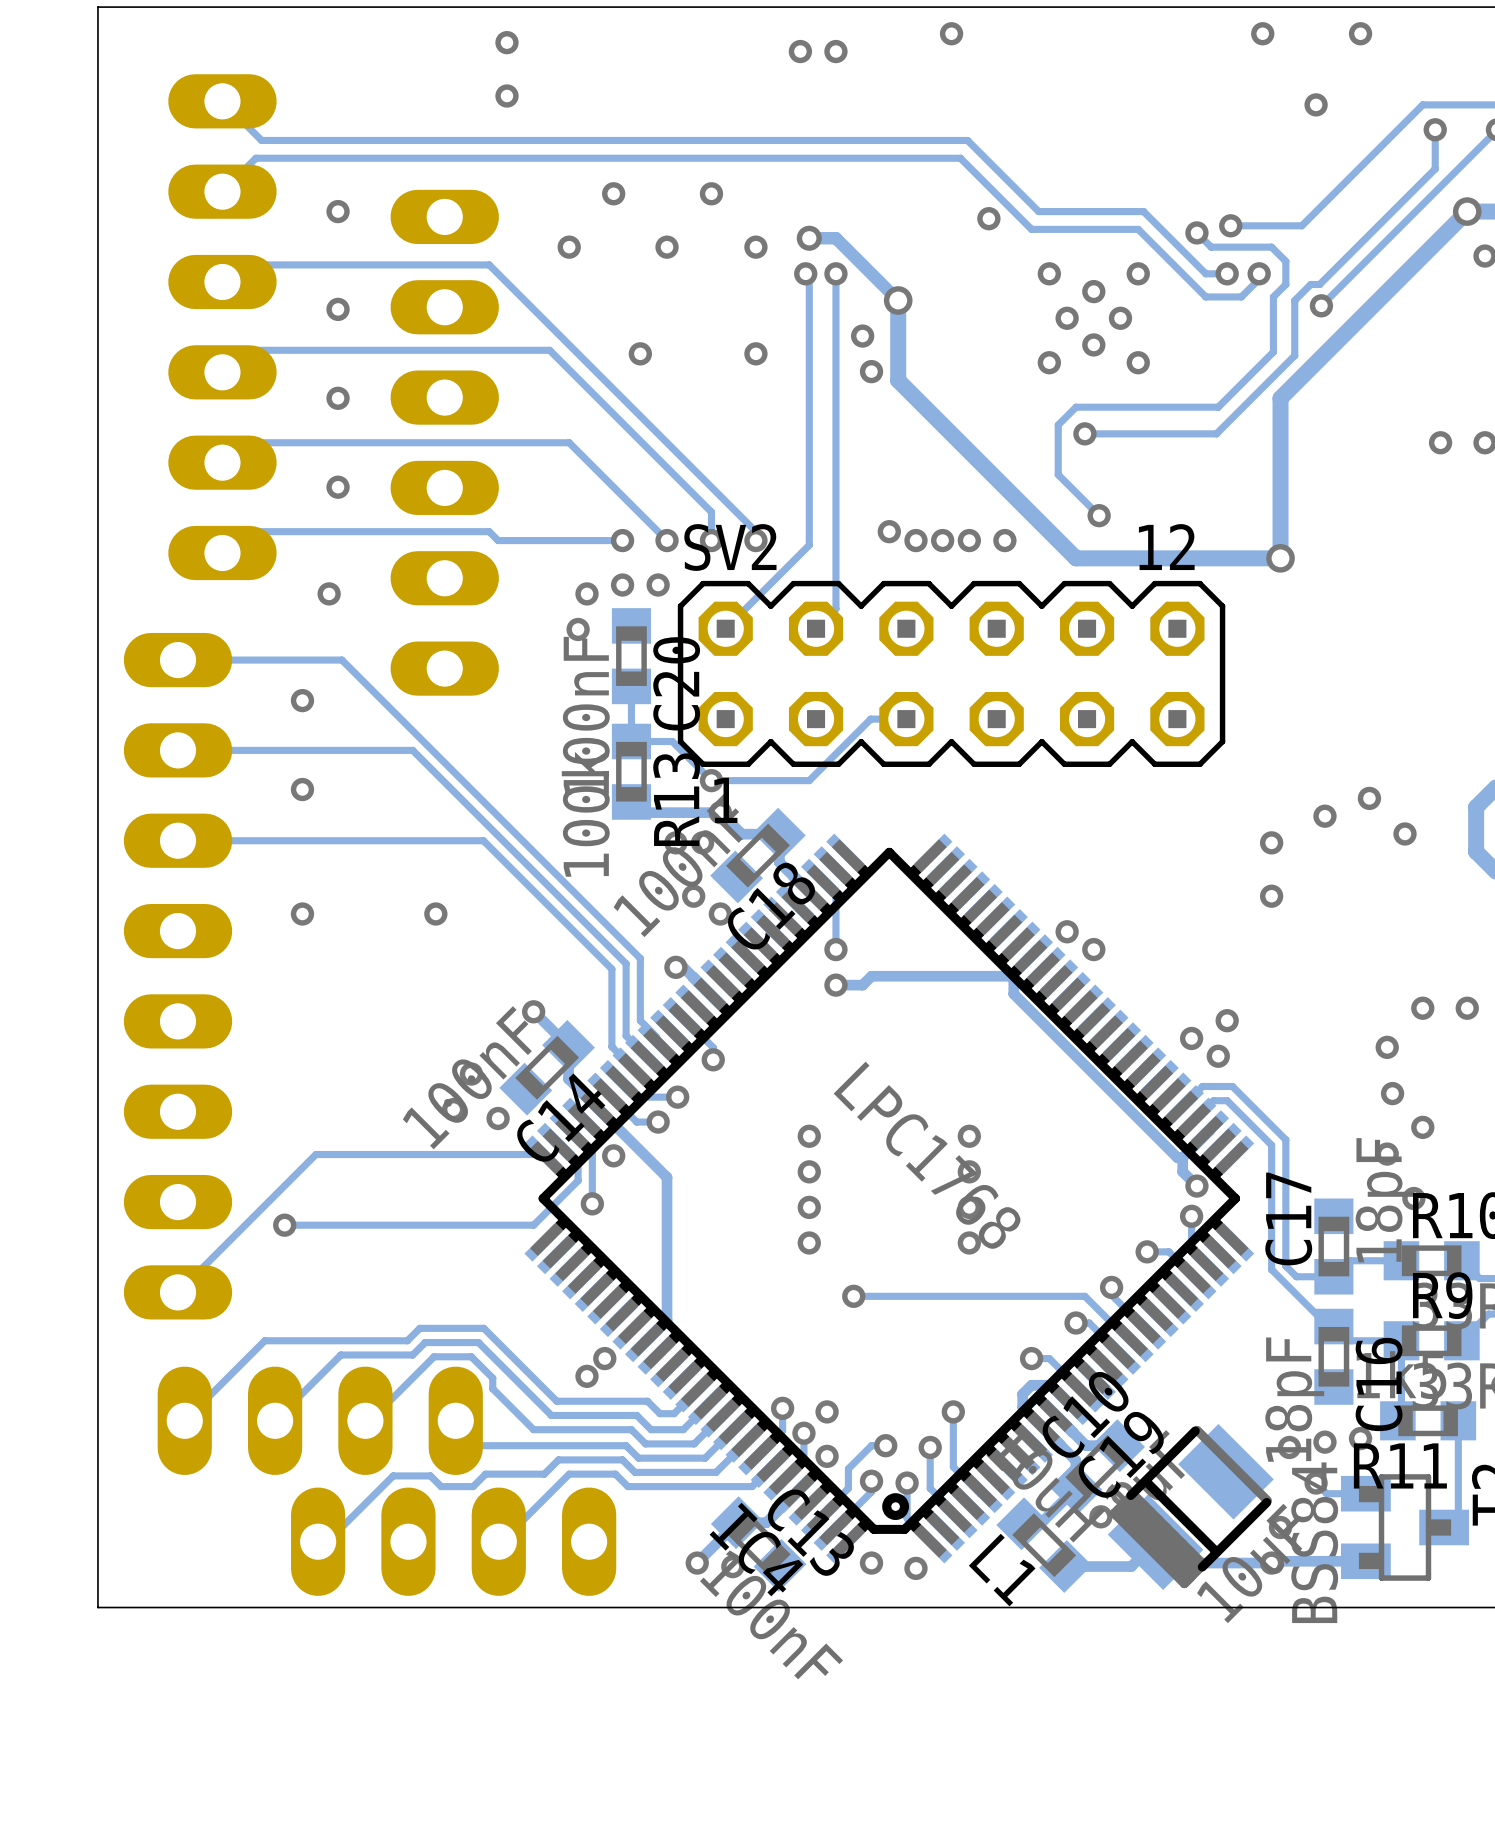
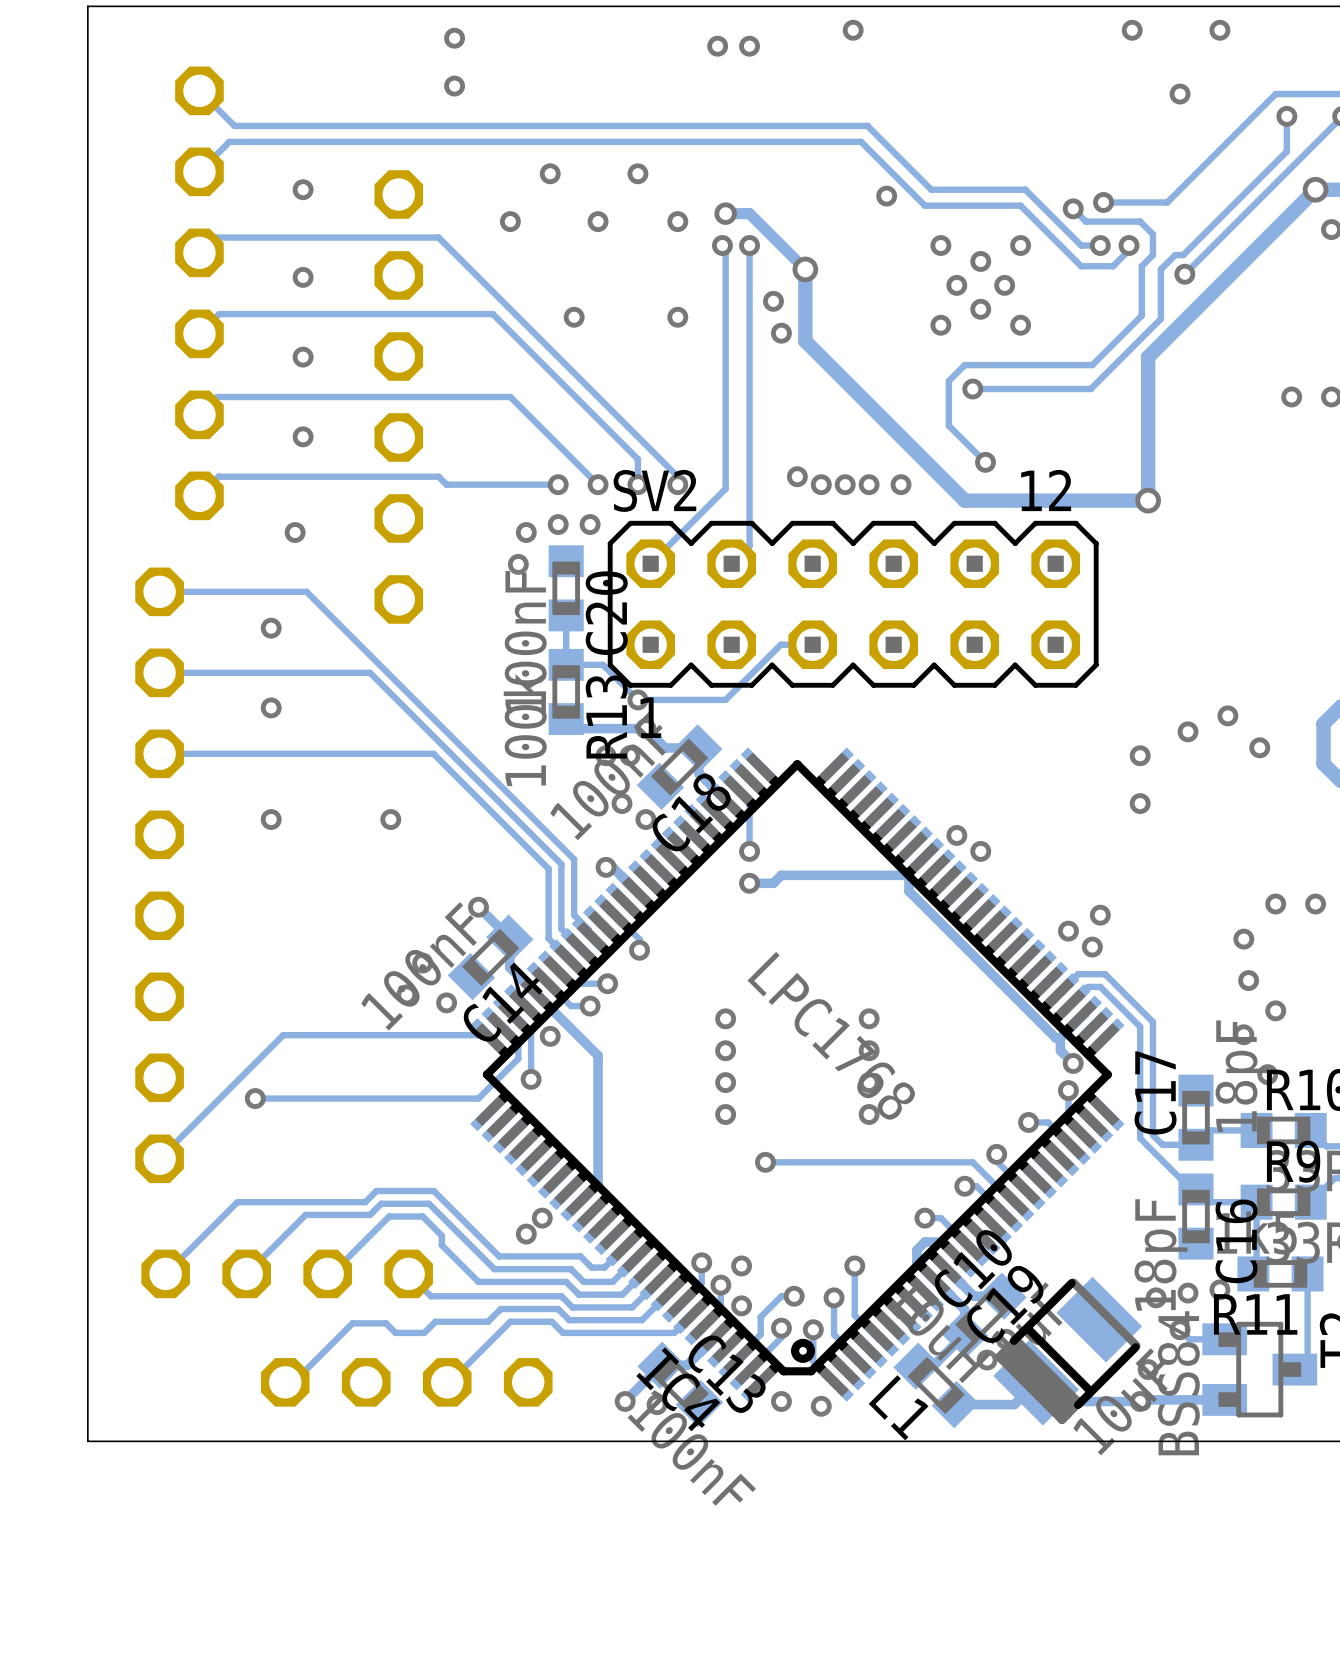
part footprint: [168, 74, 277, 581] -> [175, 66, 224, 521]
part footprint: [390, 189, 499, 696] -> [374, 170, 424, 624]
part footprint: [123, 632, 233, 1320] -> [135, 567, 184, 1184]
part footprint: [157, 1366, 483, 1476] -> [141, 1249, 433, 1299]
part footprint: [291, 1487, 617, 1596] -> [260, 1358, 553, 1407]

